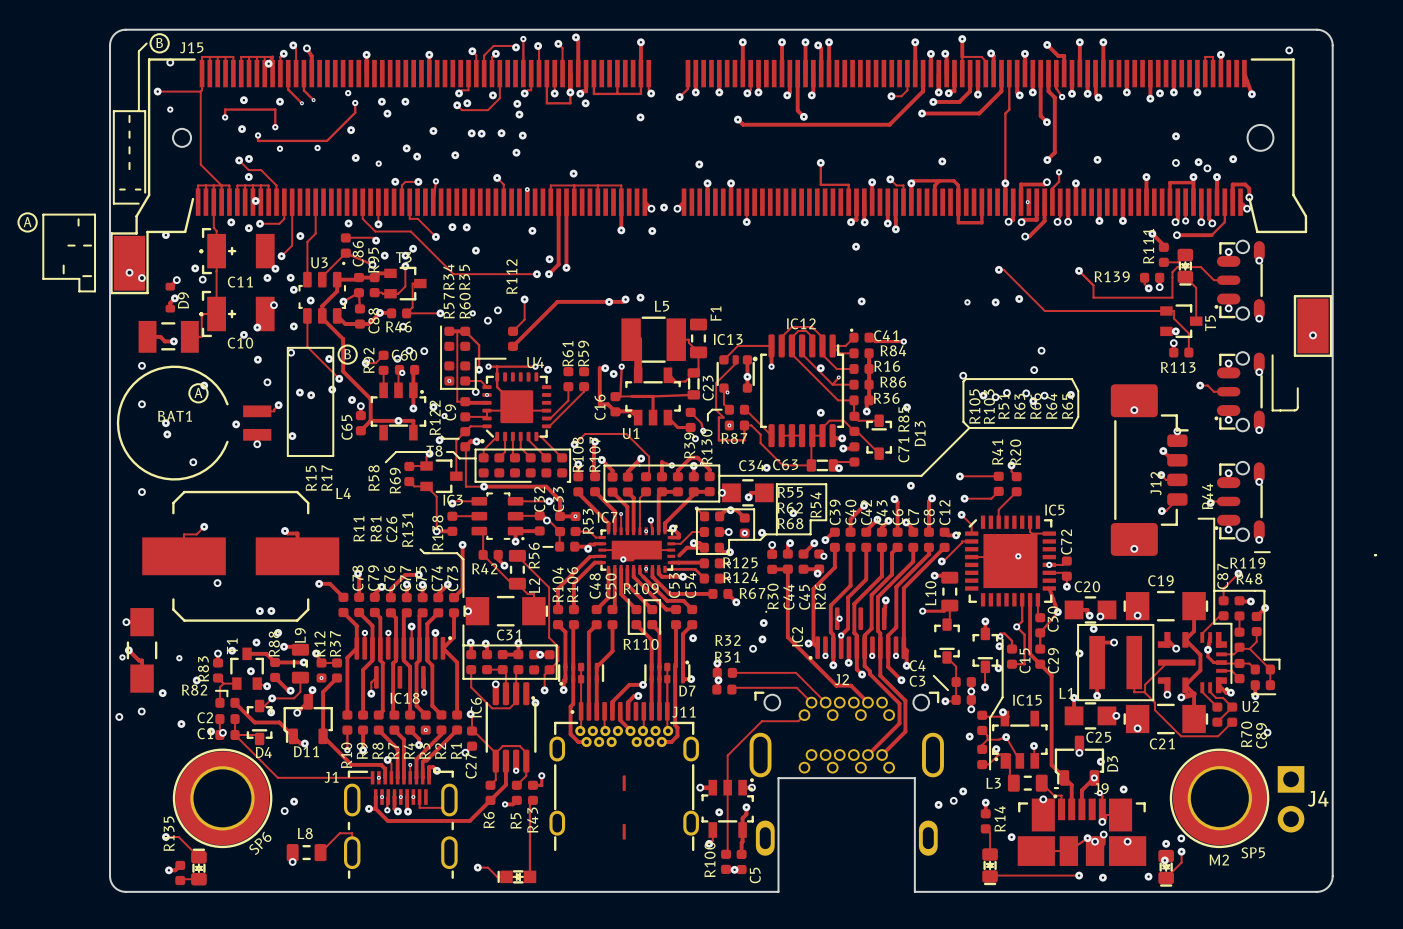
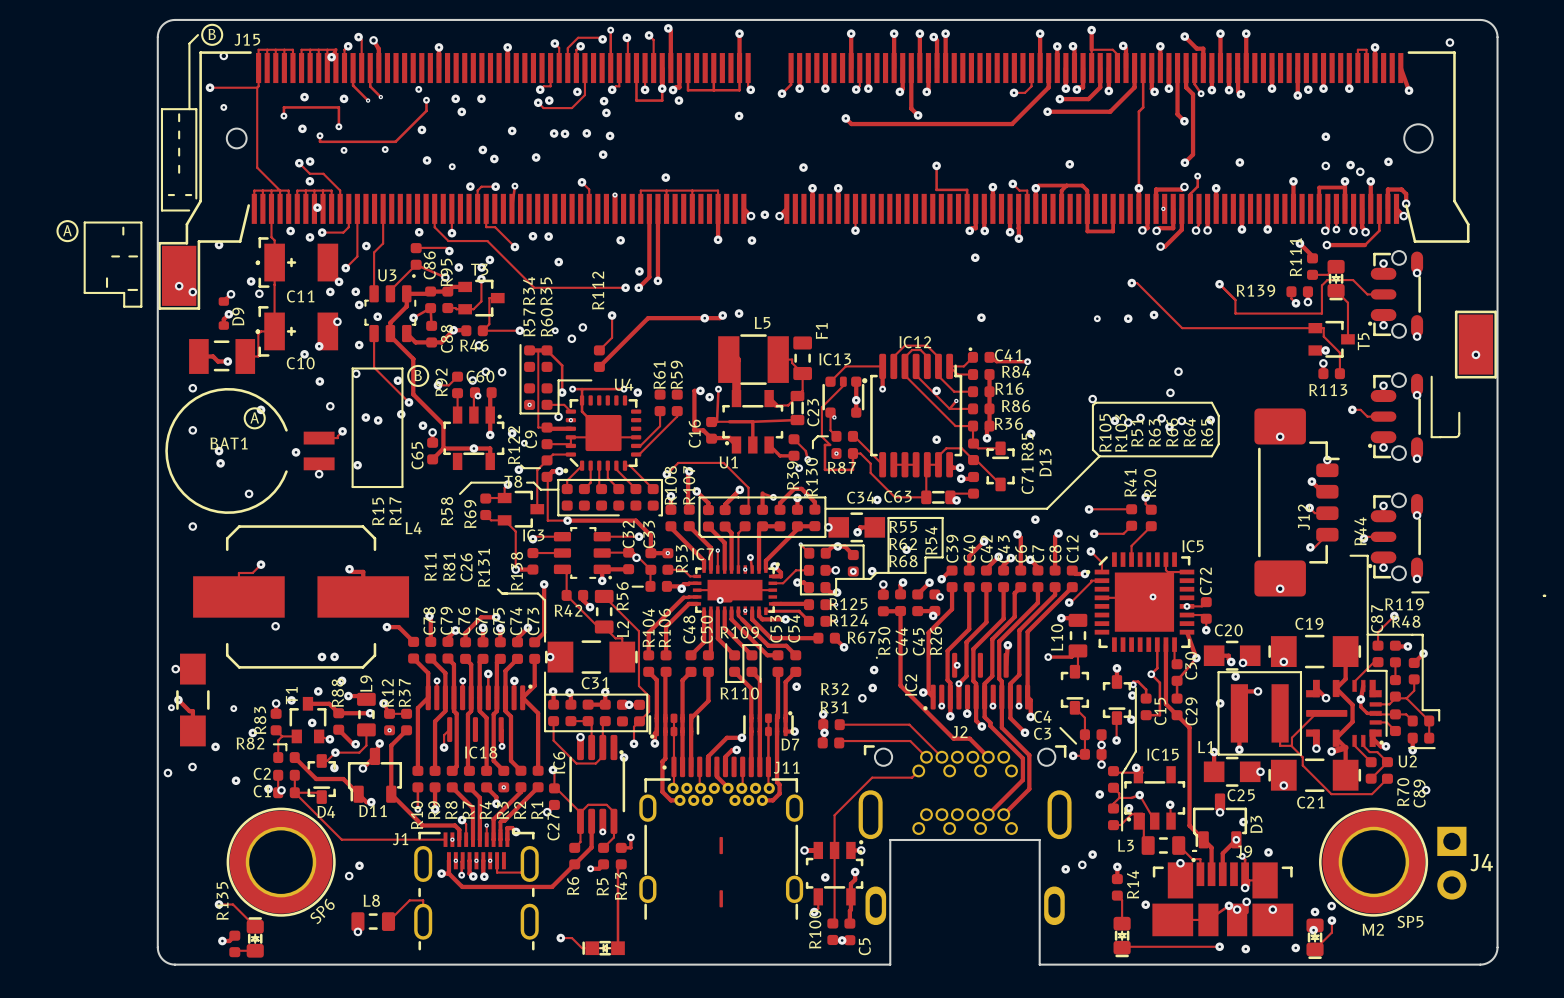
track: (704, 547) (687, 547) (679, 555) -> none

